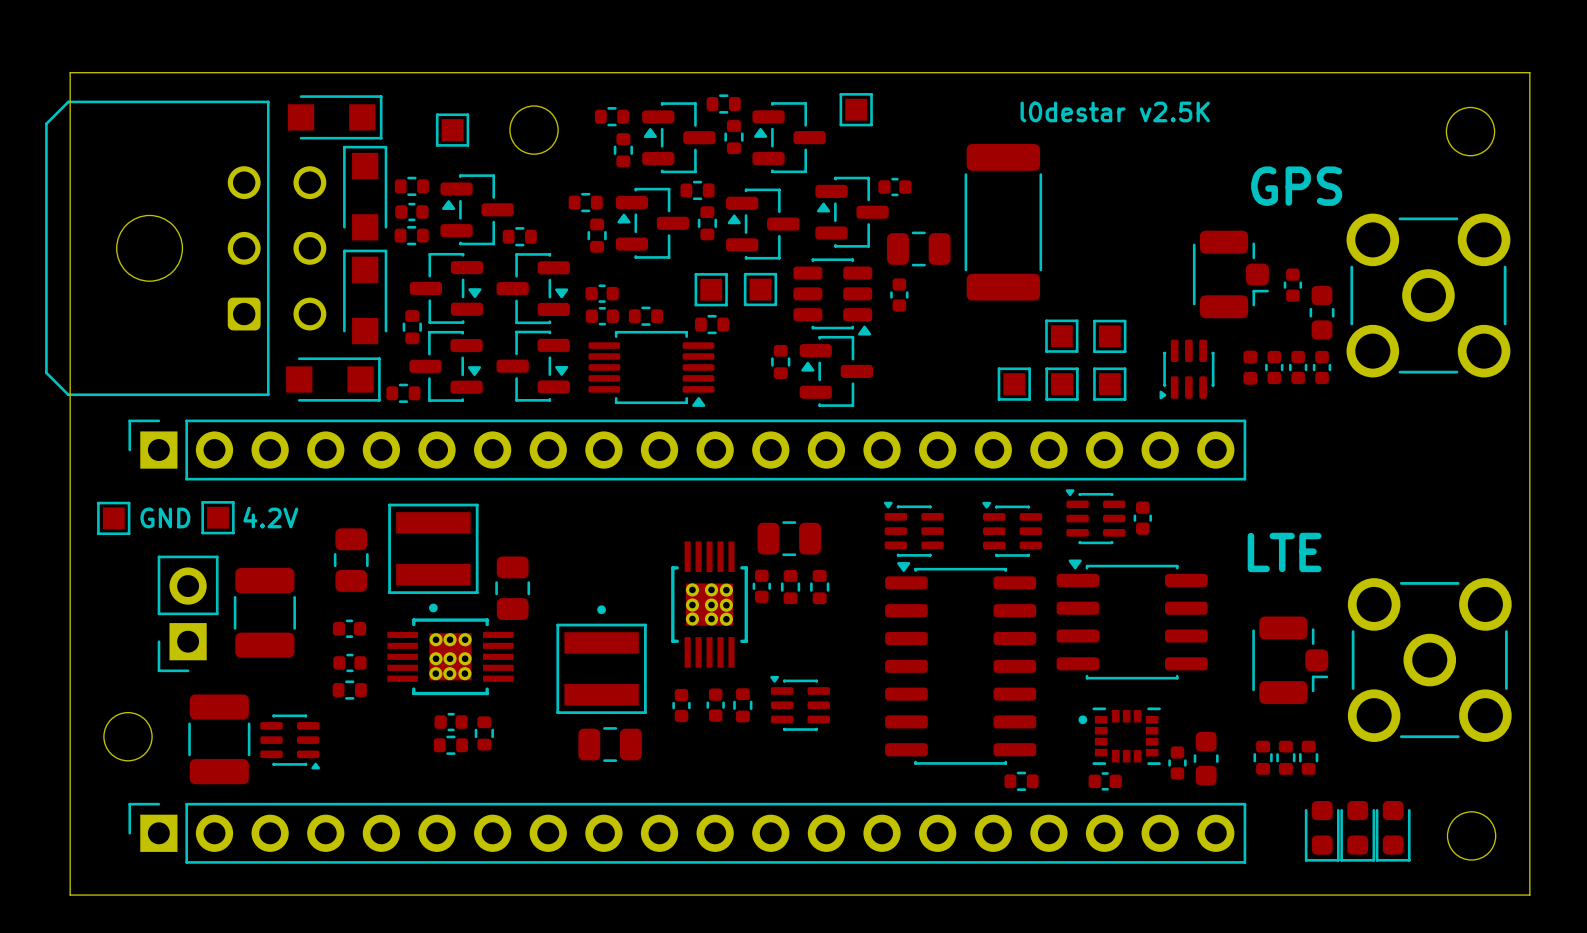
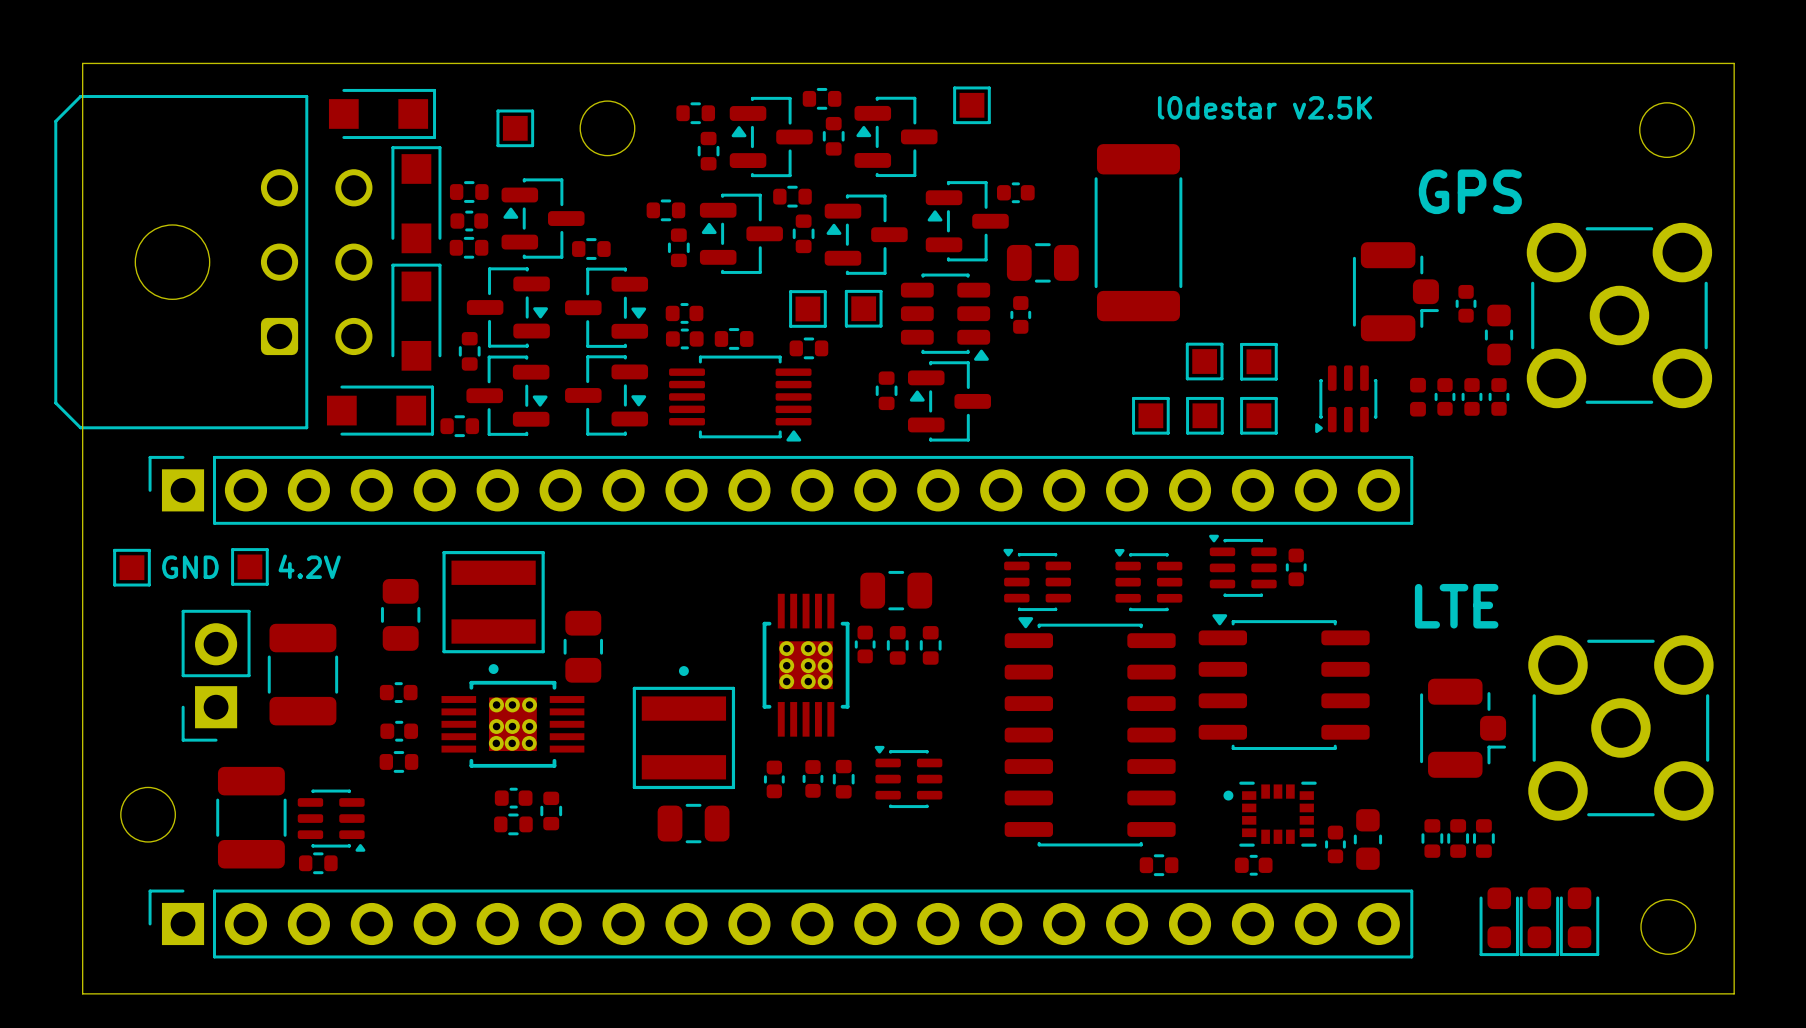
part: none -> (318, 863)

